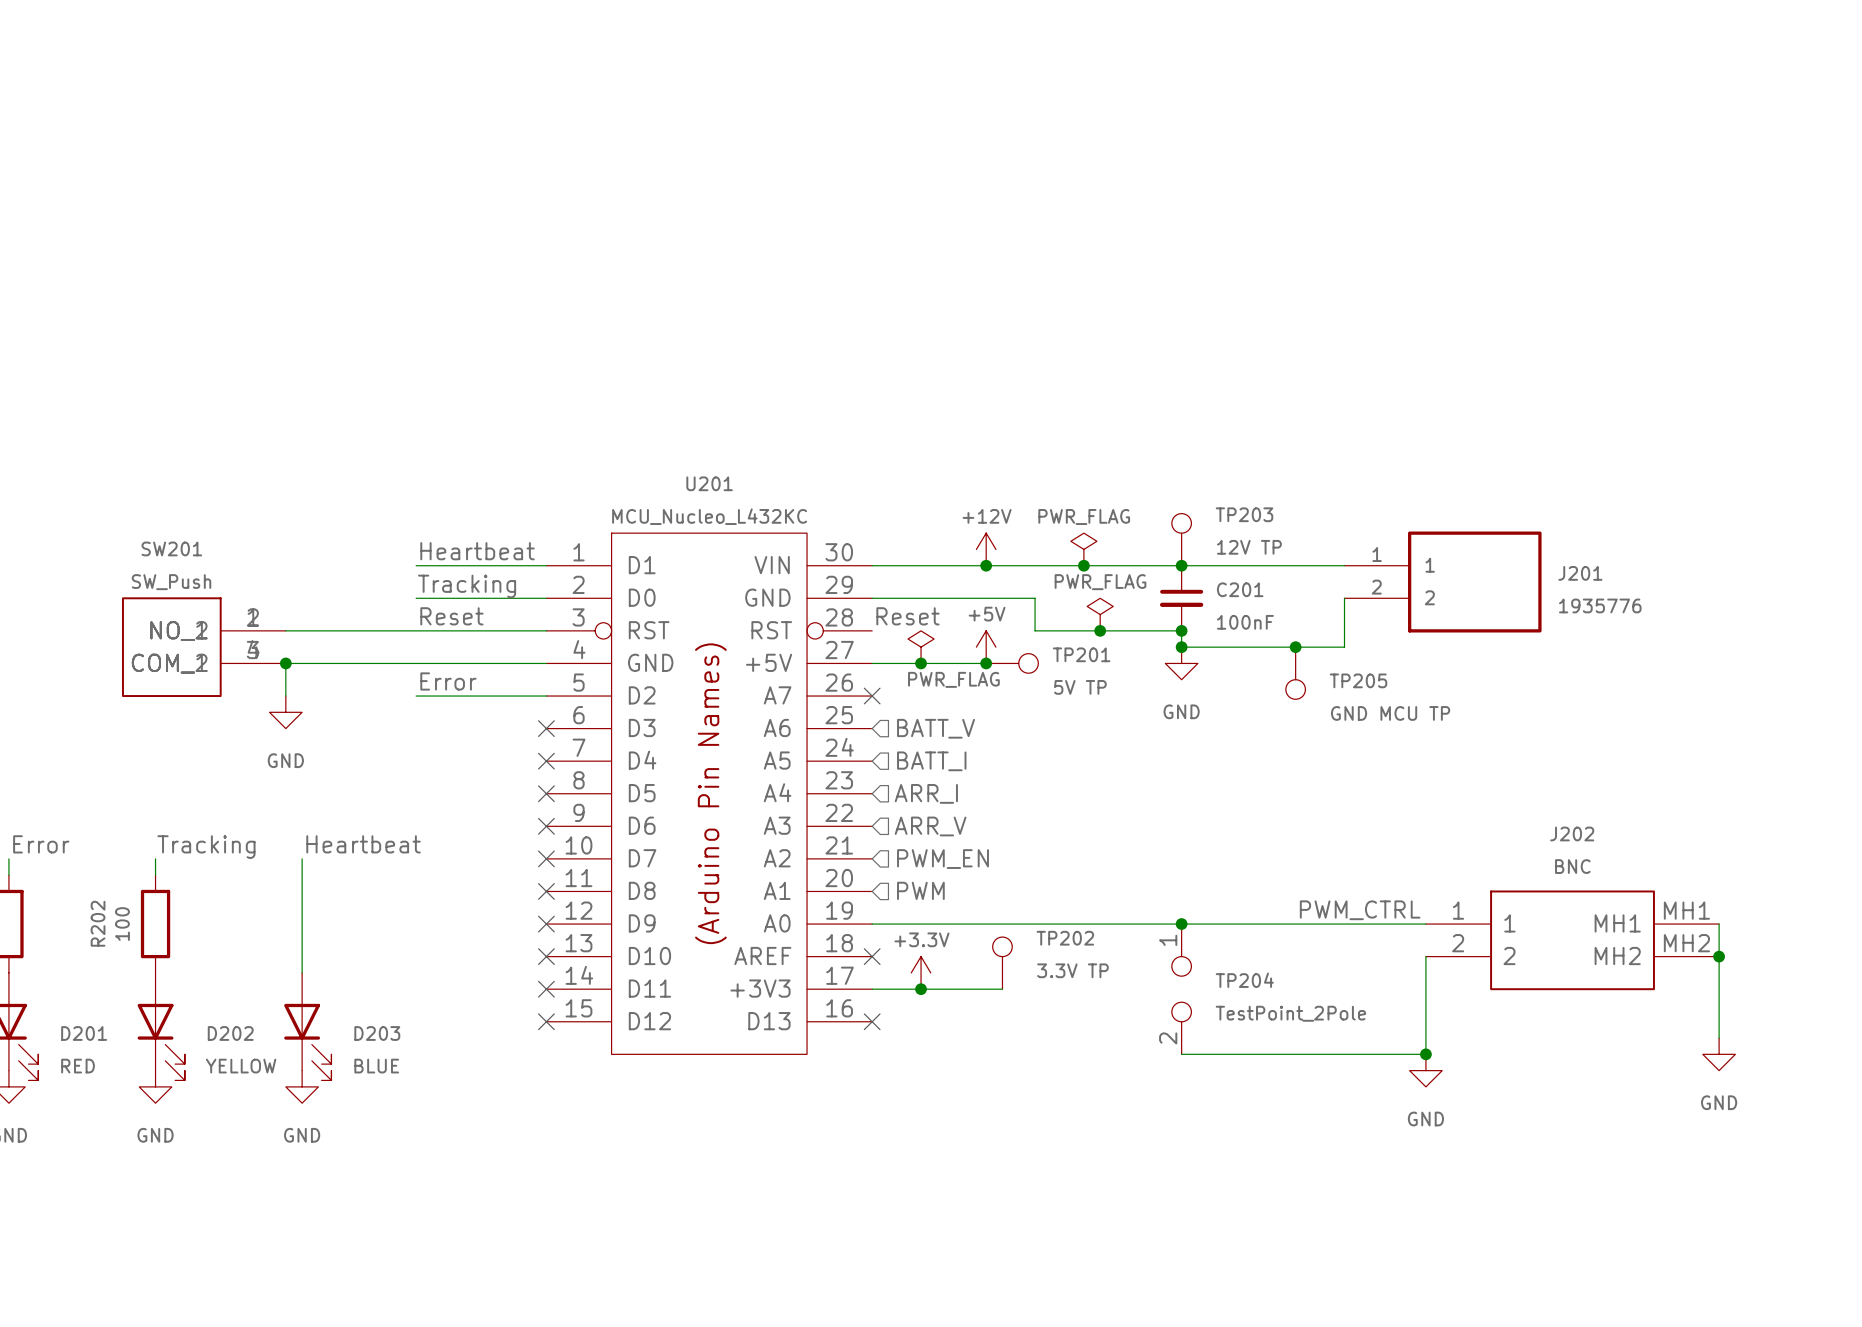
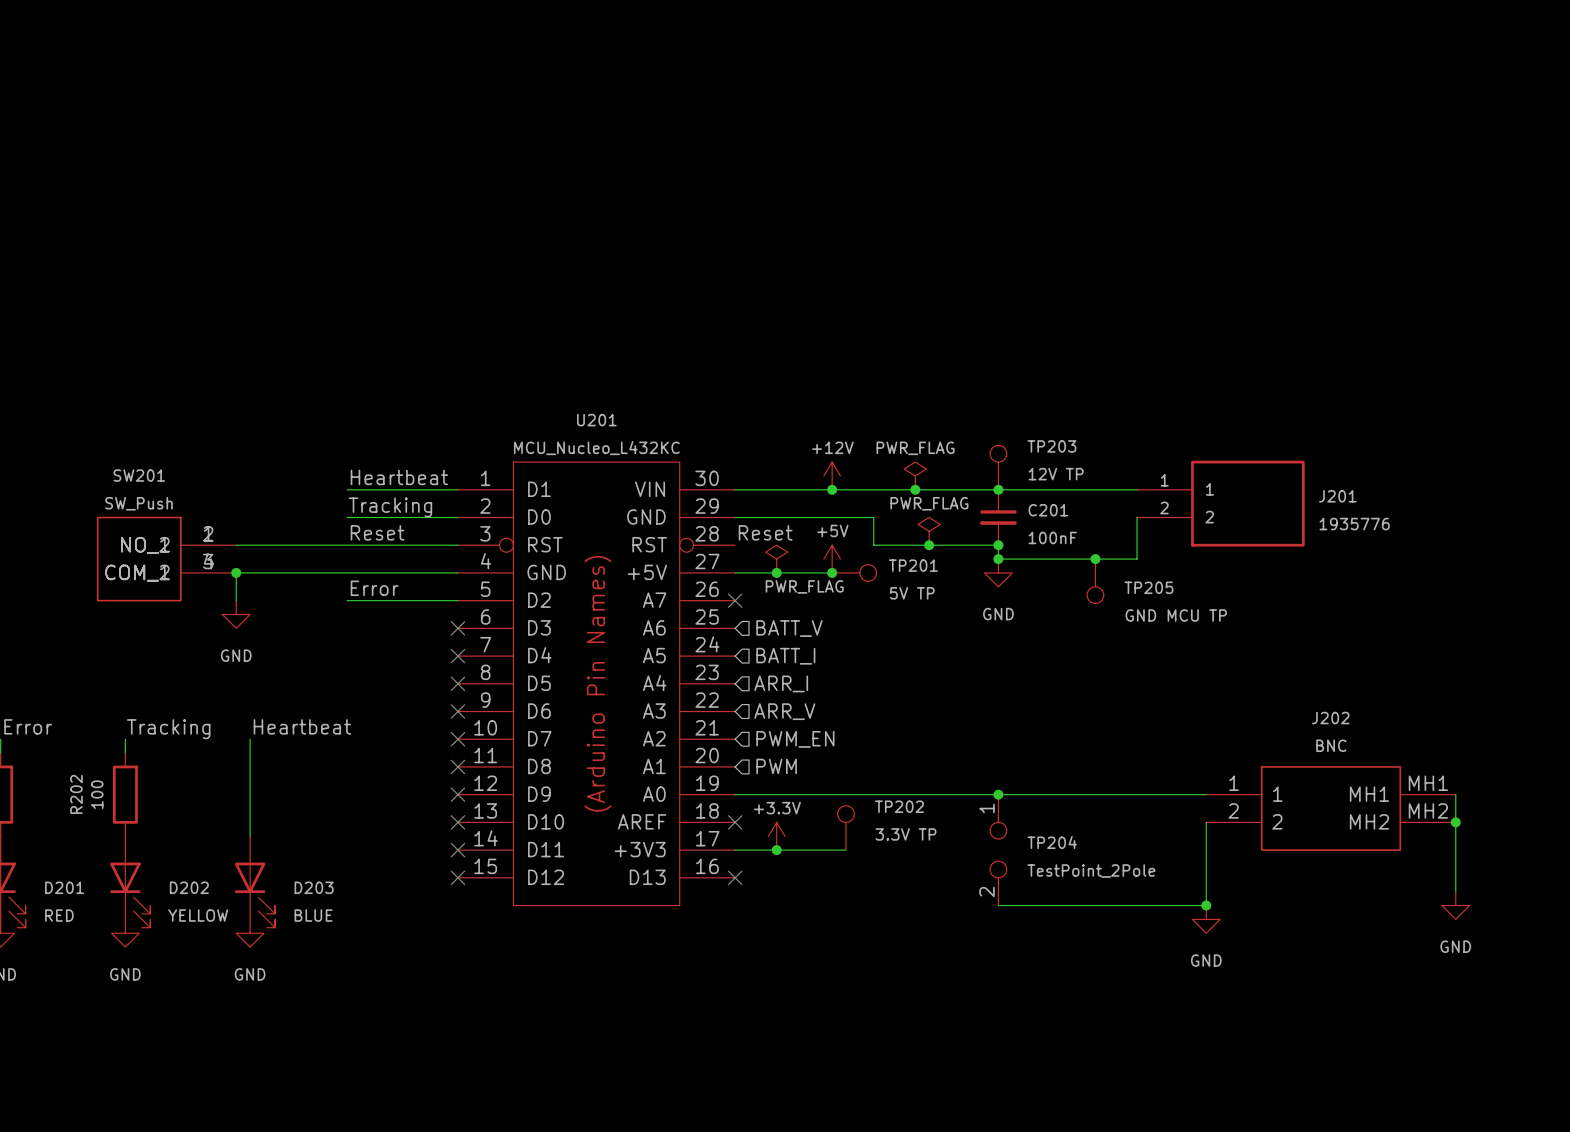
label: PWM_CTRL (1360, 910) -> none

